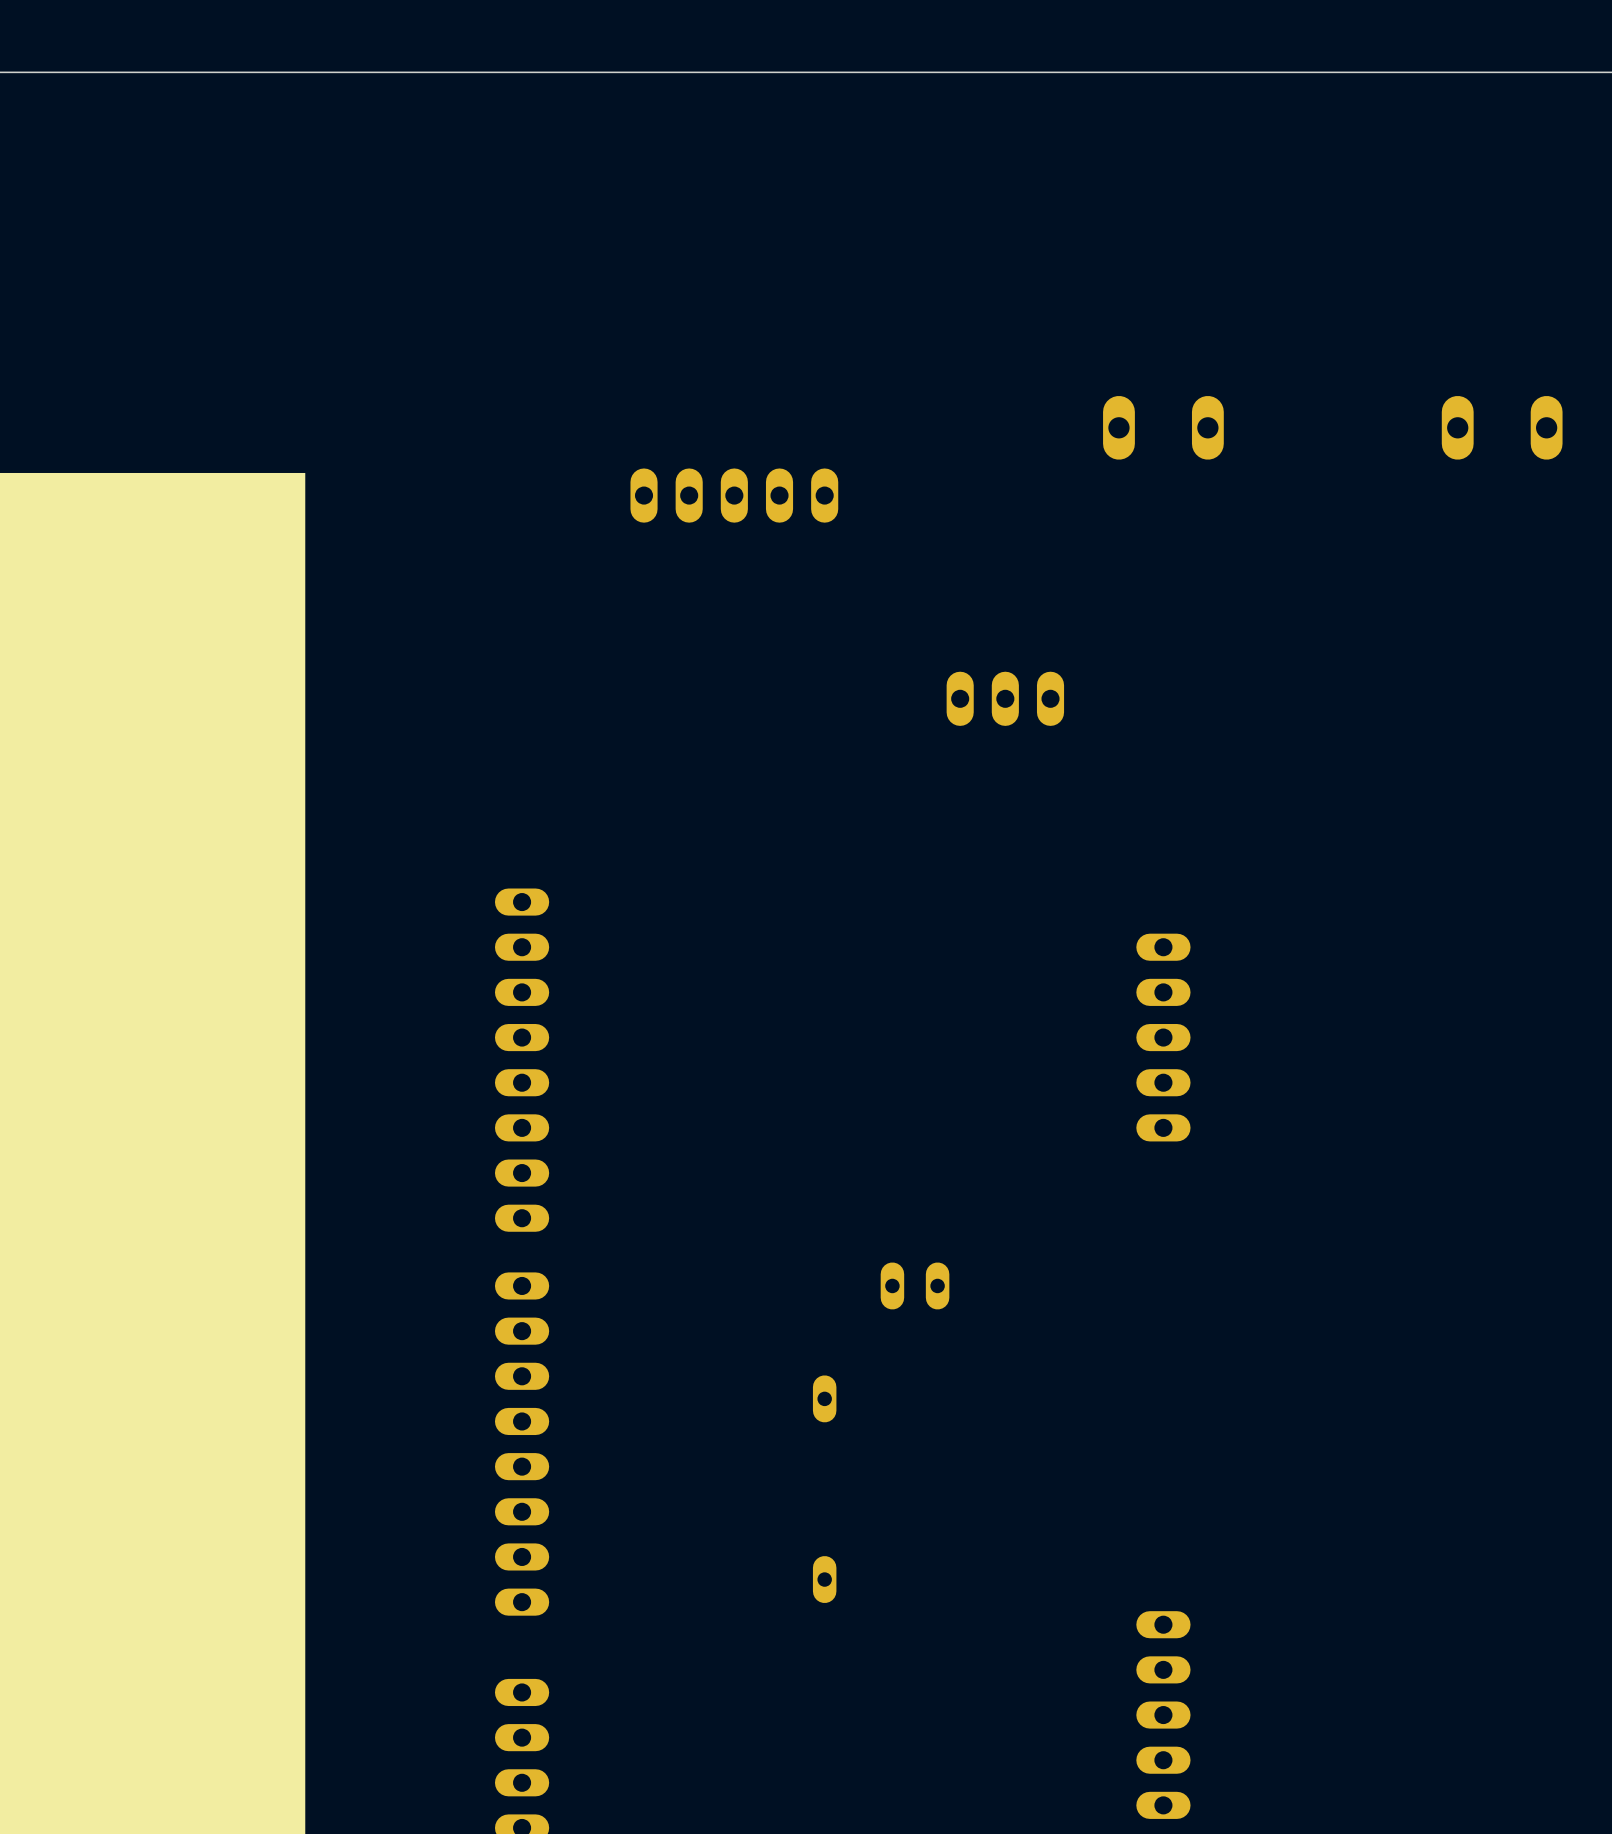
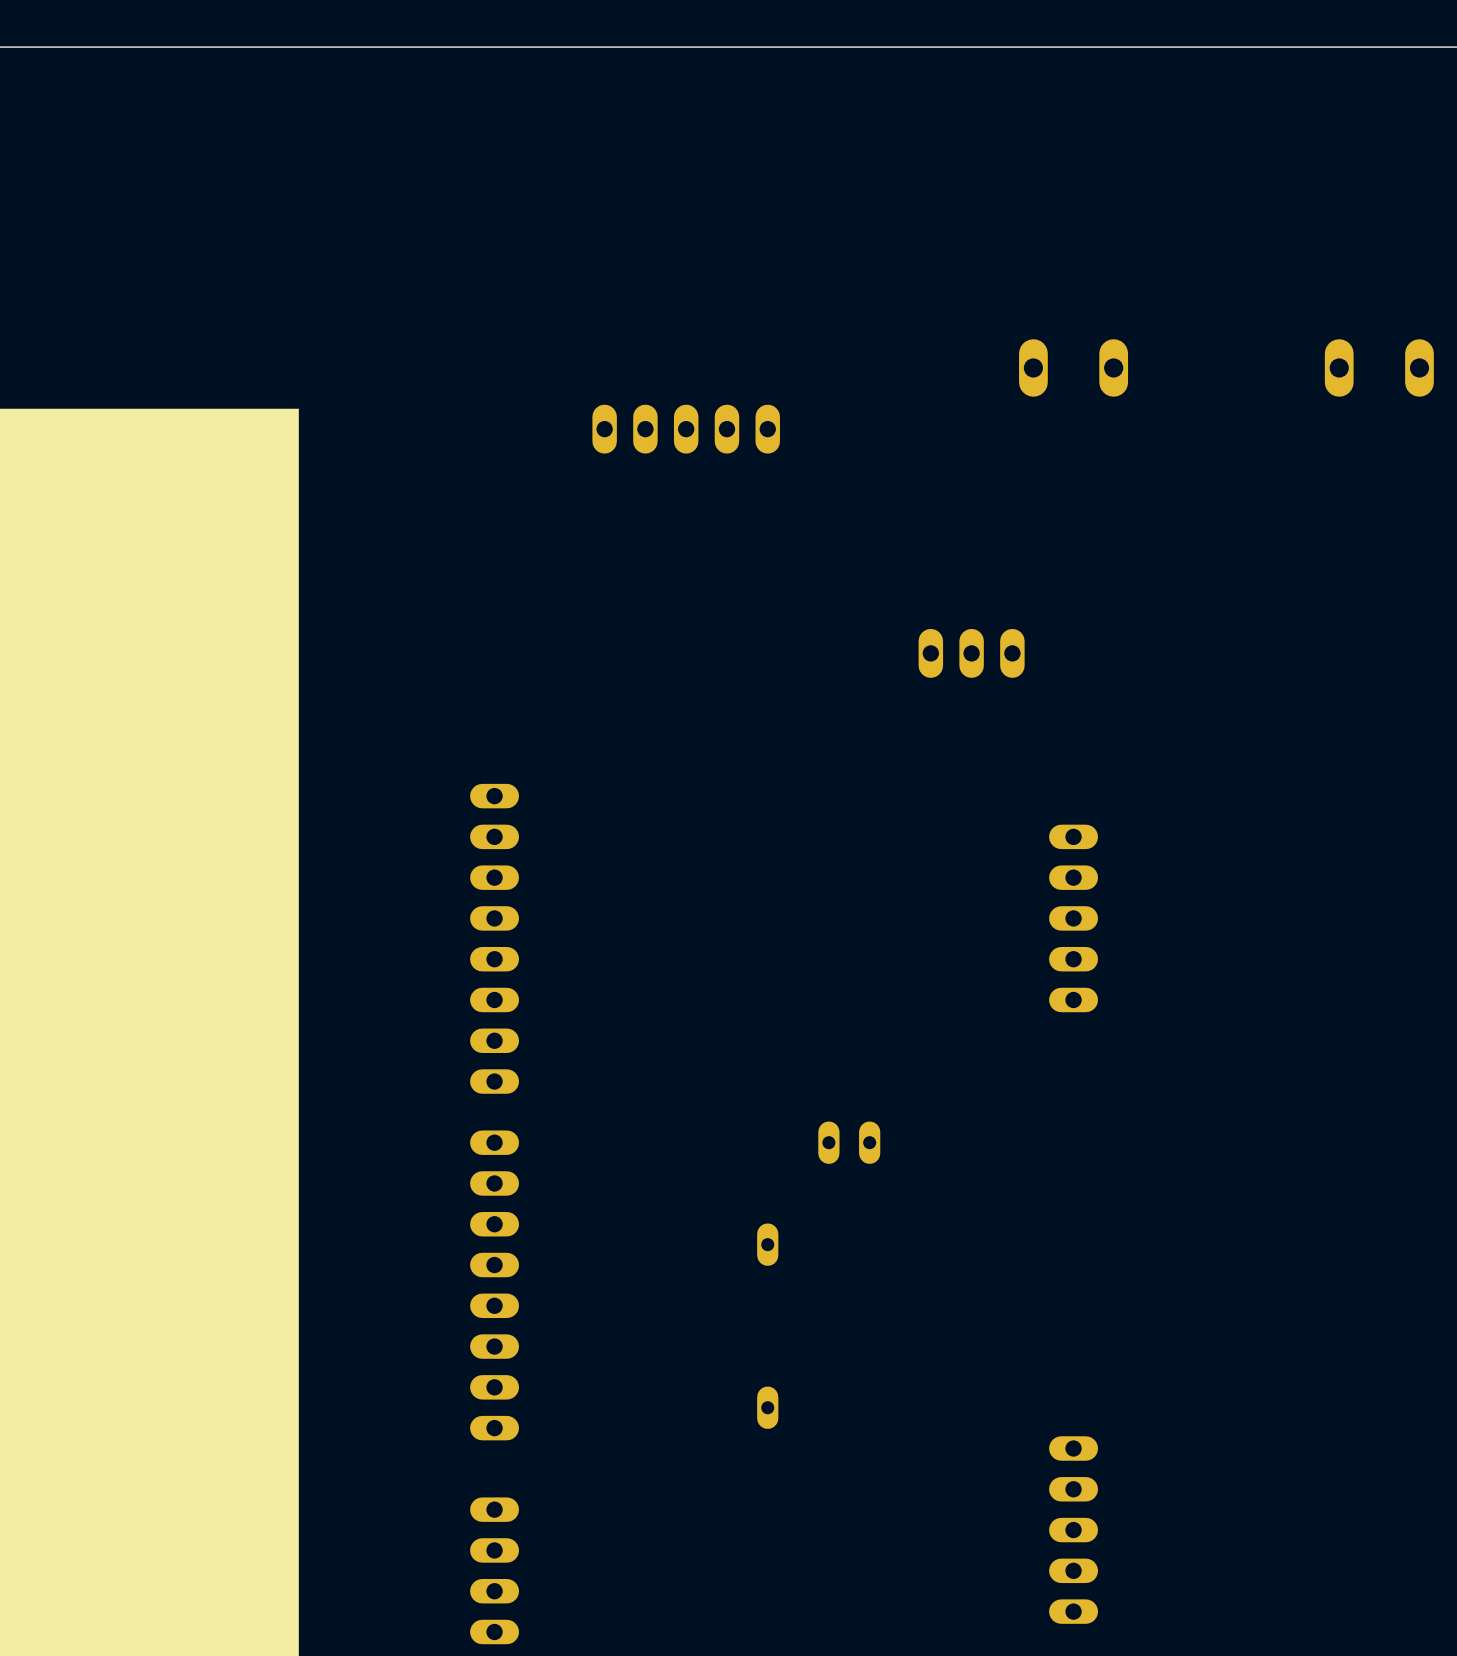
part position: (1005, 698) -> (971, 653)

